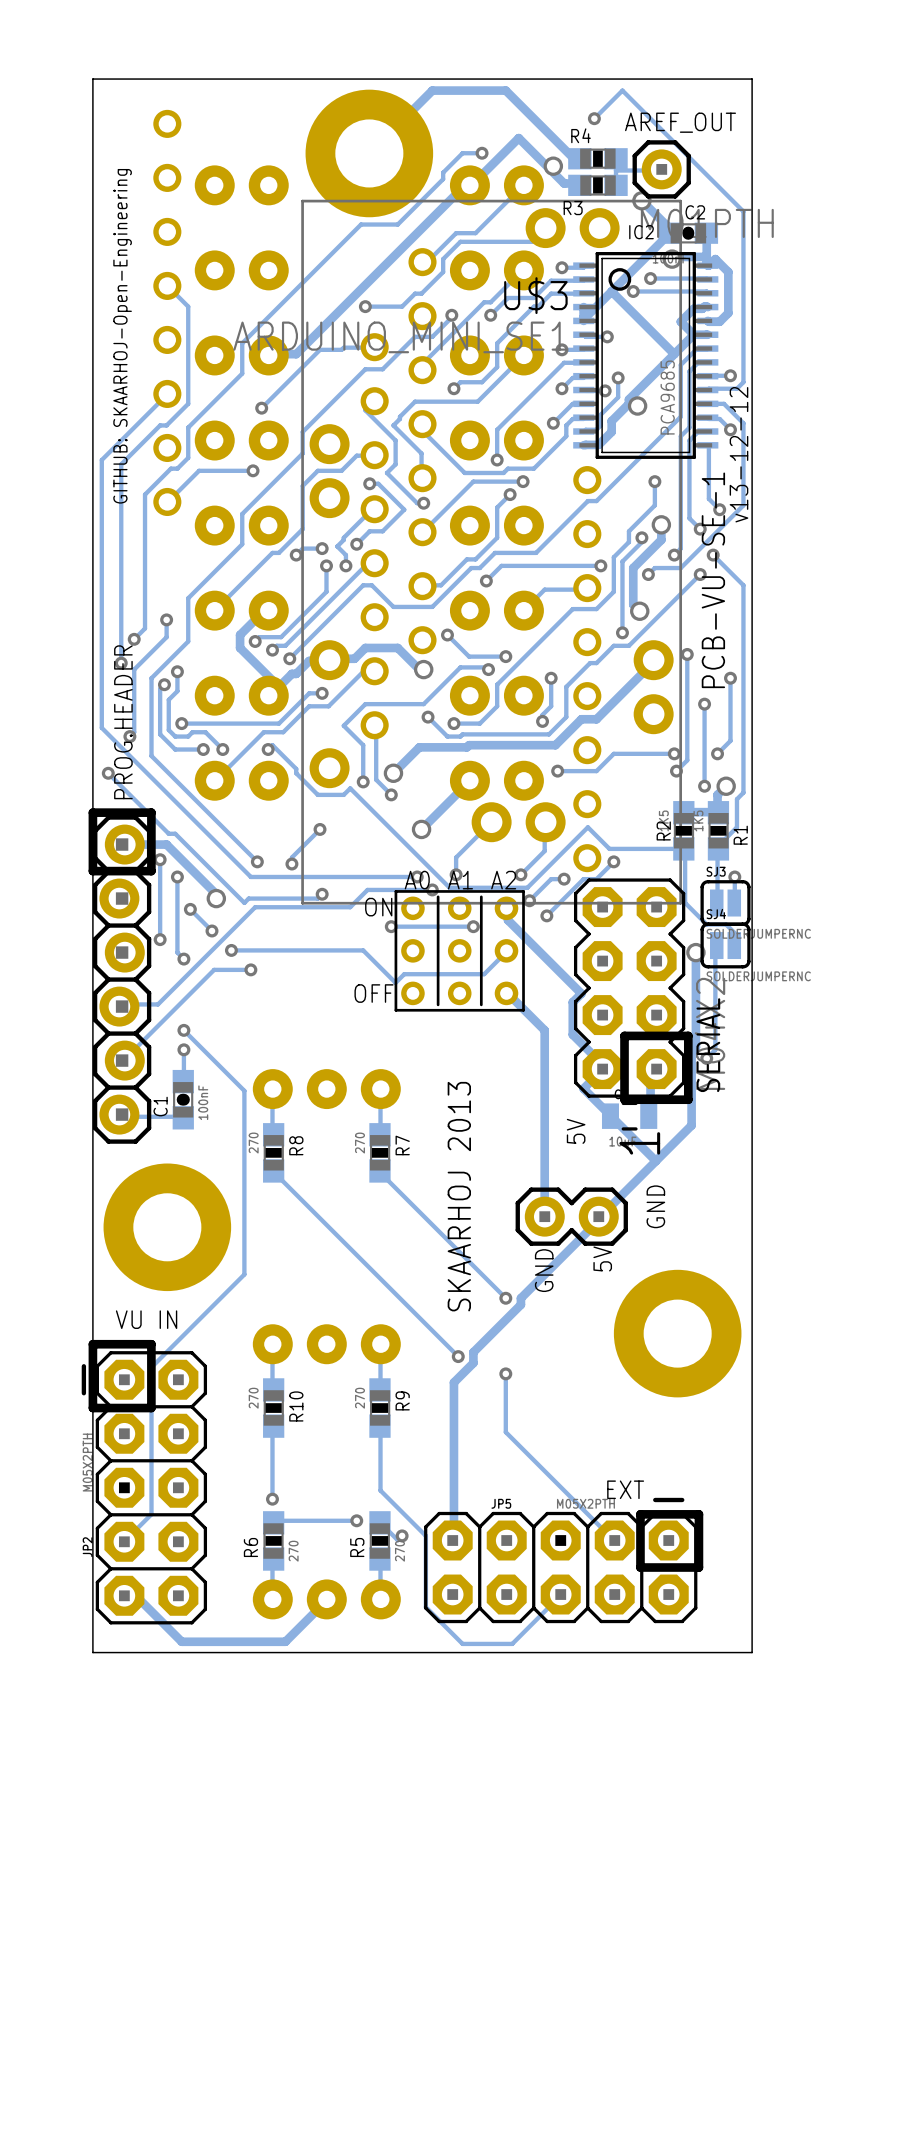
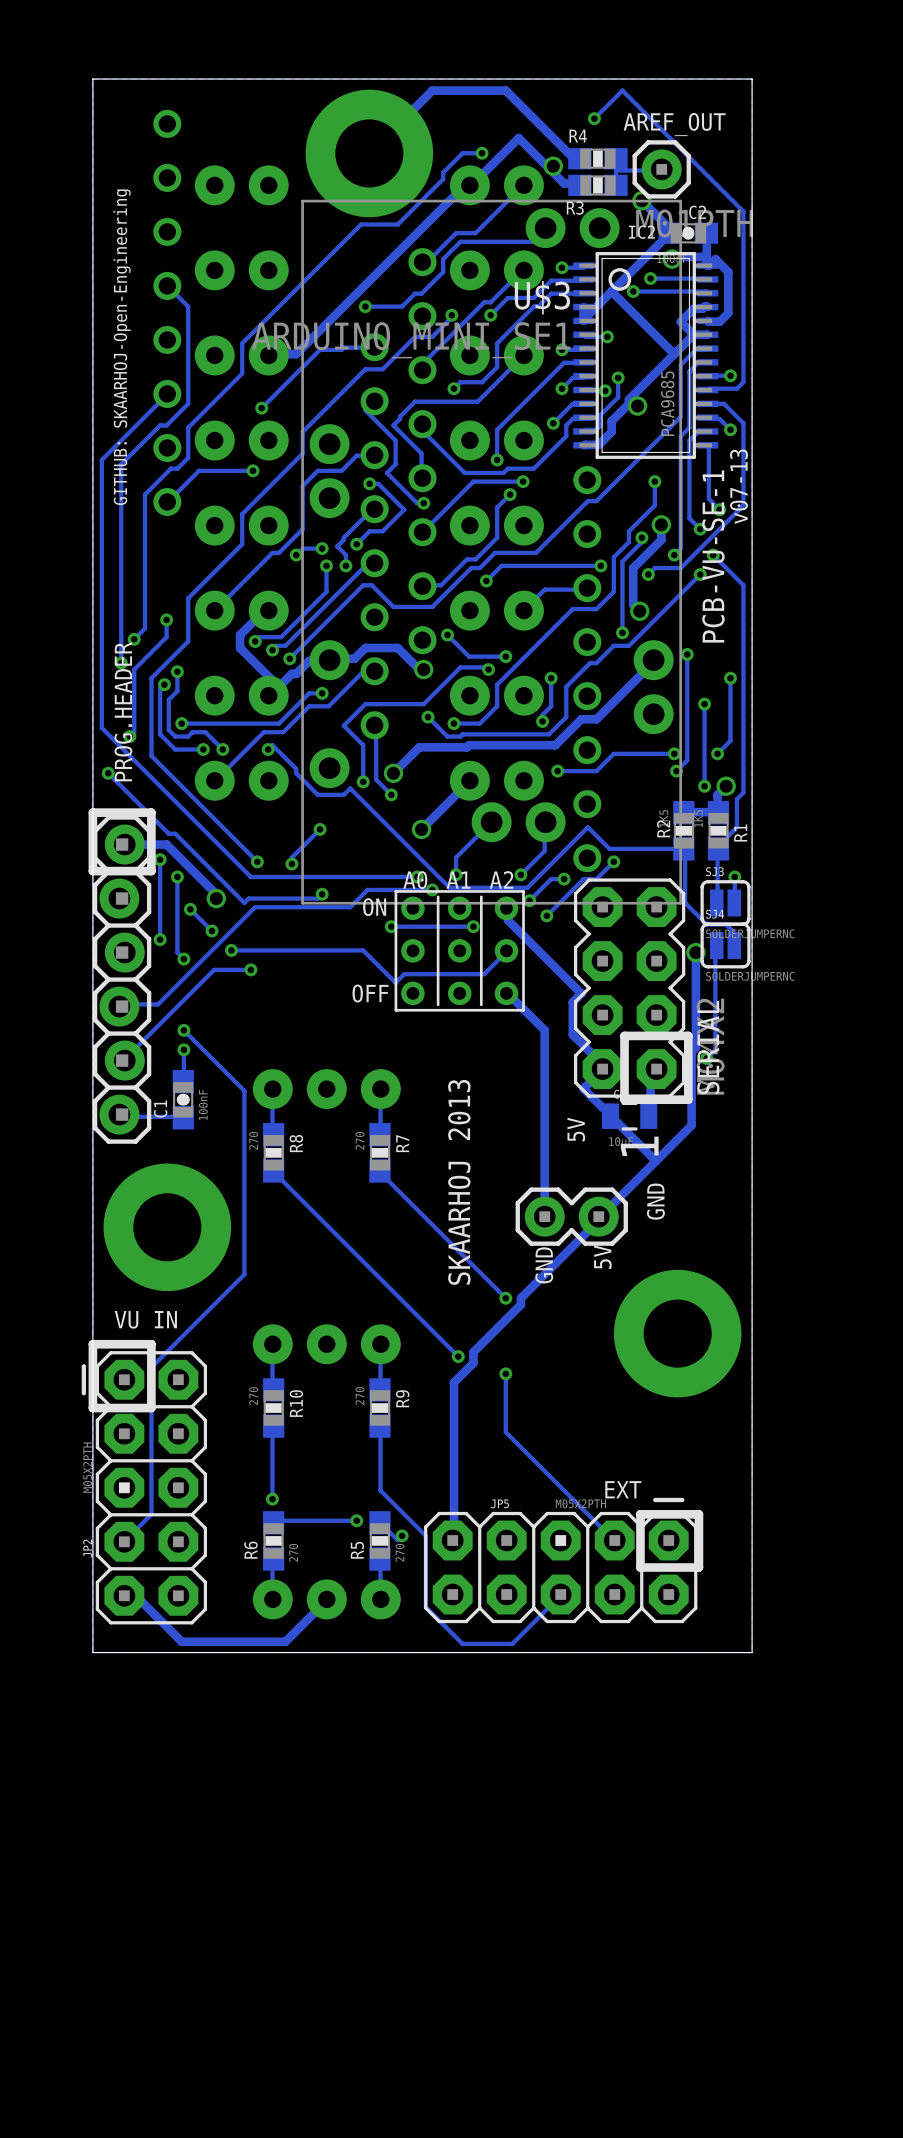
zone outline: none -> (752, 79) (92, 79) (92, 1652) (752, 1652) (752, 79)
text: v13-12-12 (738, 454) -> v07-13 (739, 486)

